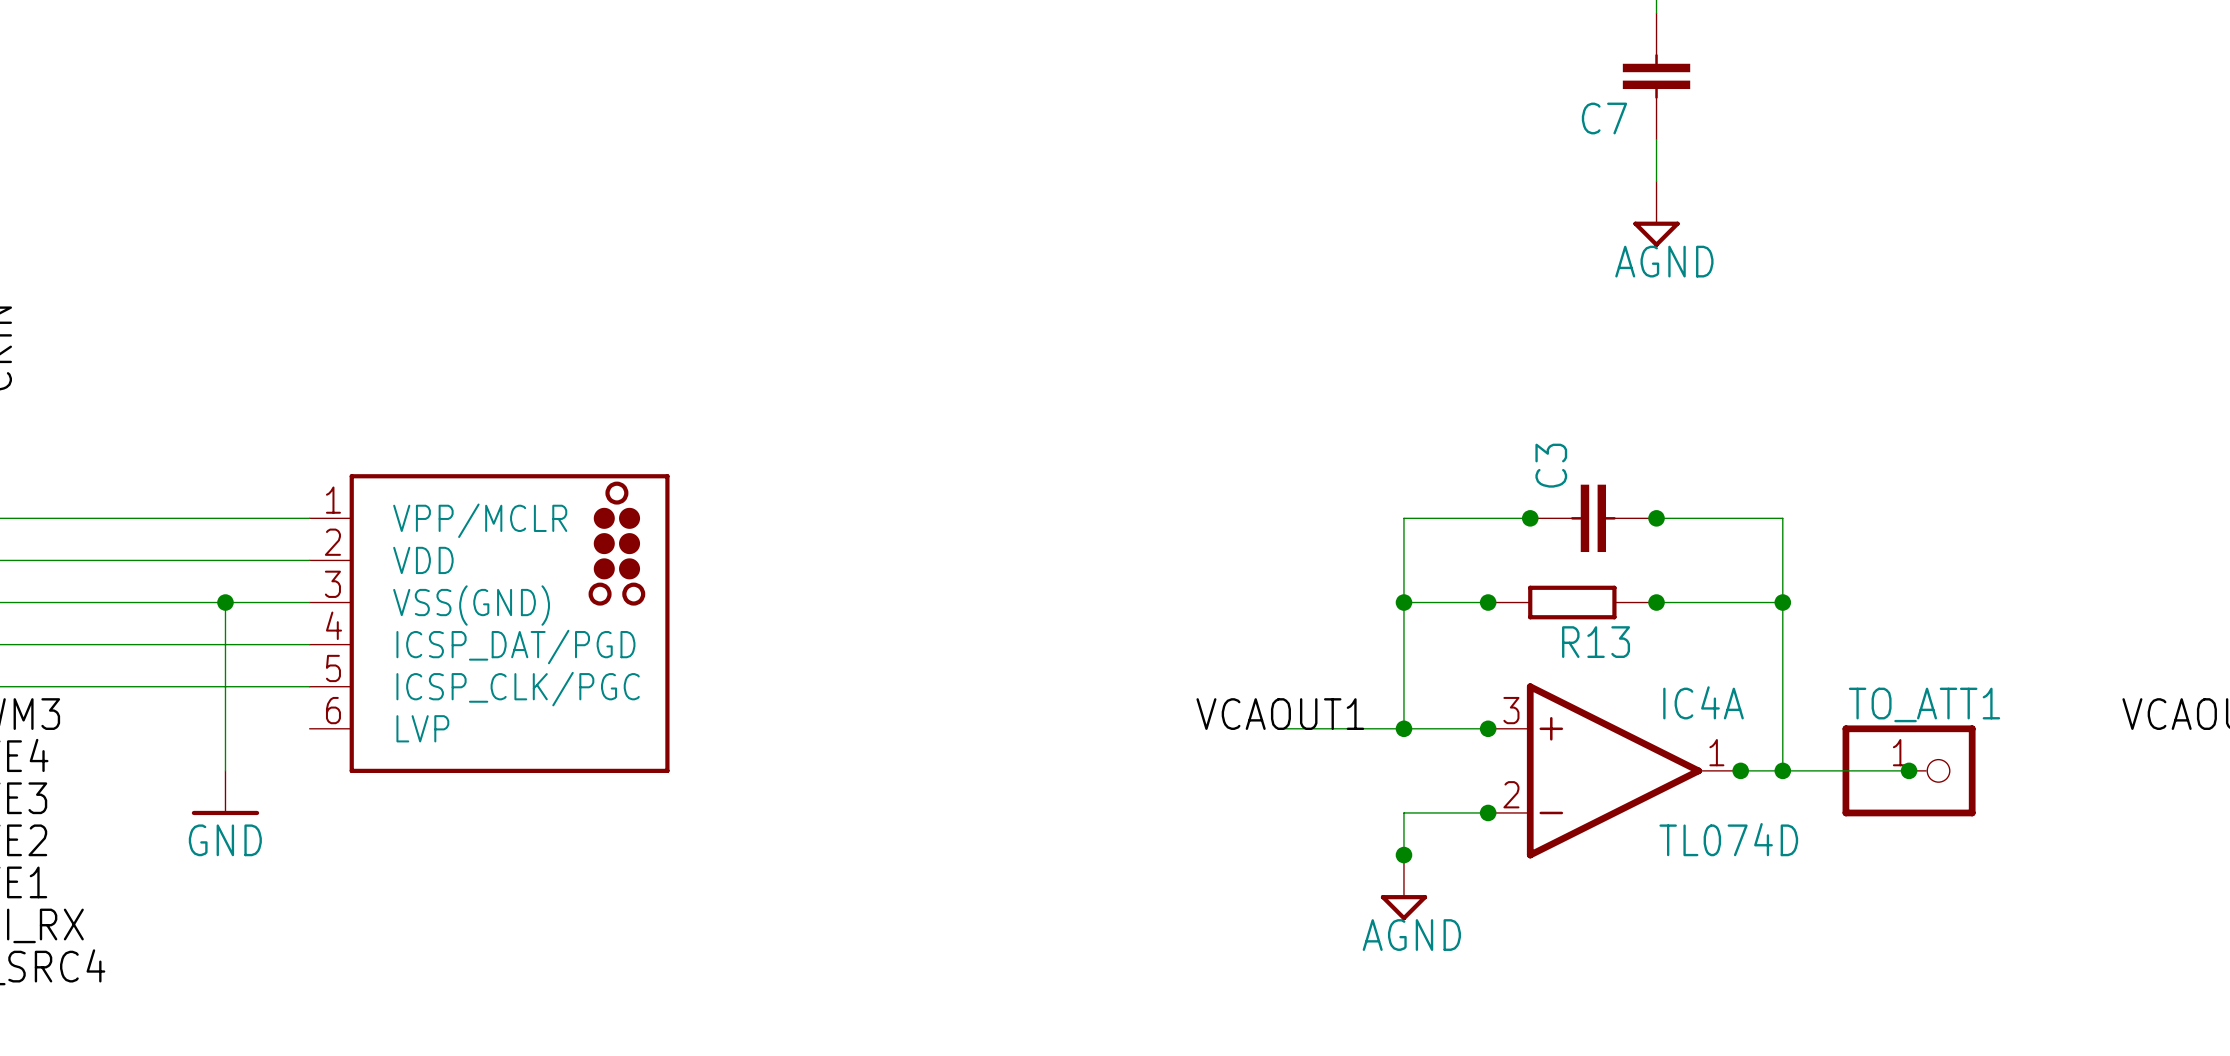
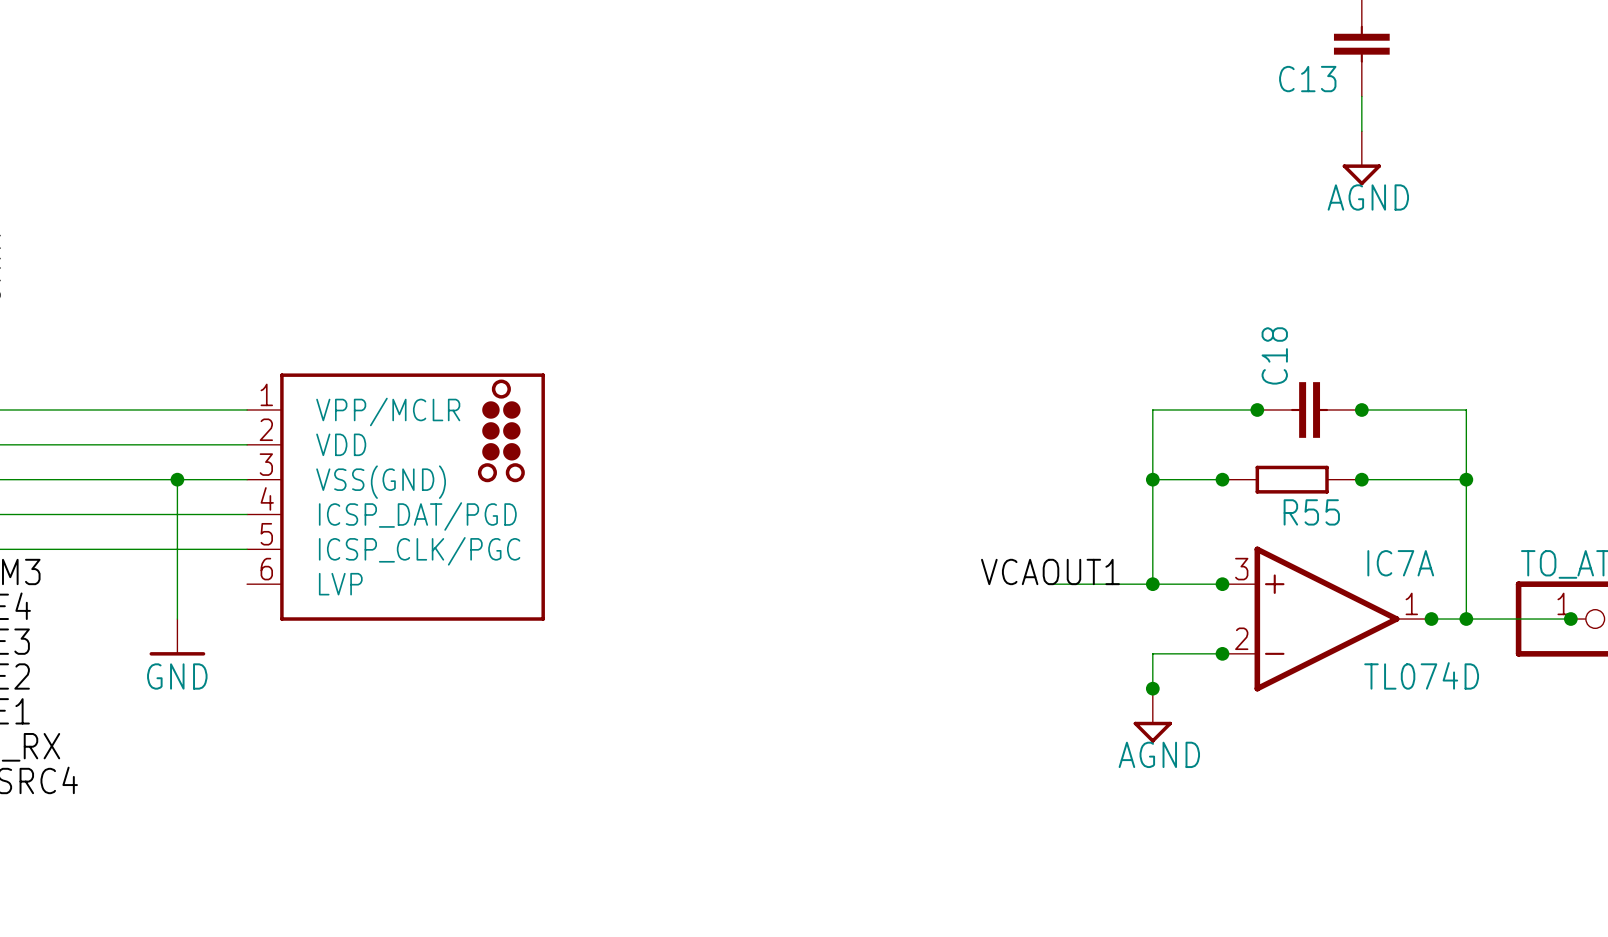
C7 name: C7 (1604, 118) -> C13 (1307, 79)
C3 name: C3 (1551, 465) -> C18 (1274, 355)
R13 name: R13 (1596, 642) -> R55 (1311, 512)
IC4A name: IC4A (1703, 702) -> IC7A (1400, 563)

